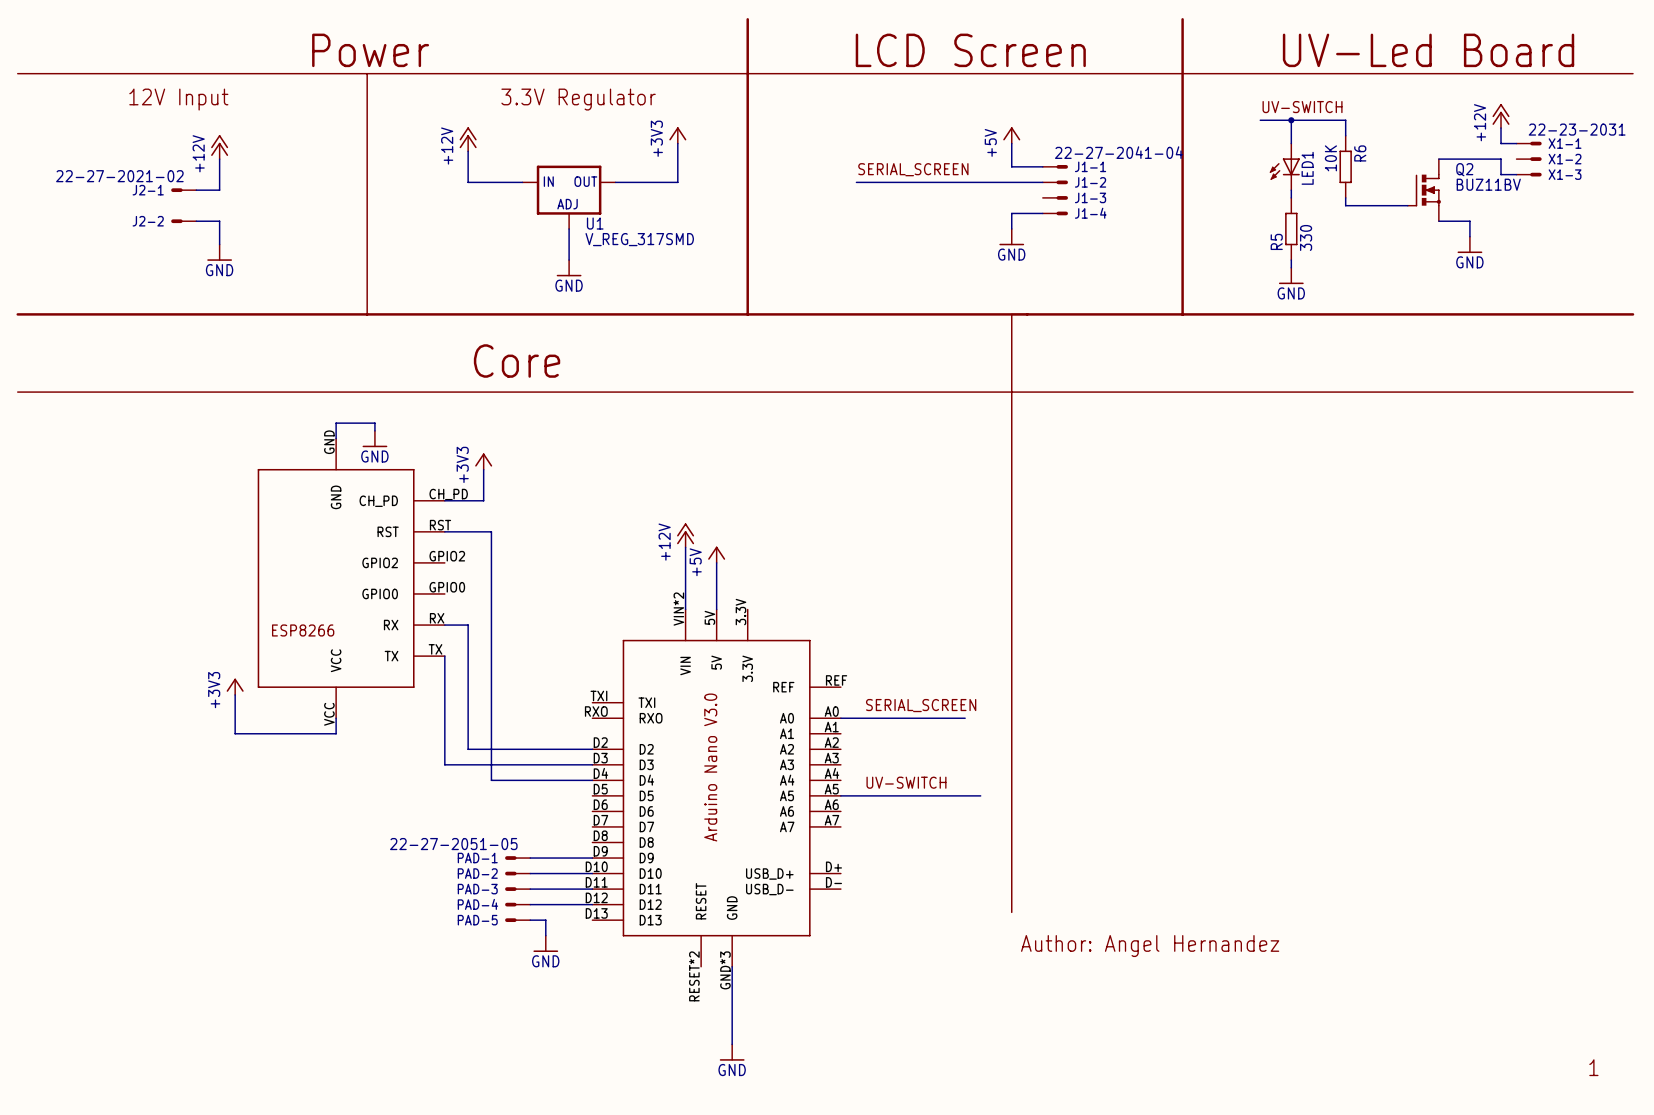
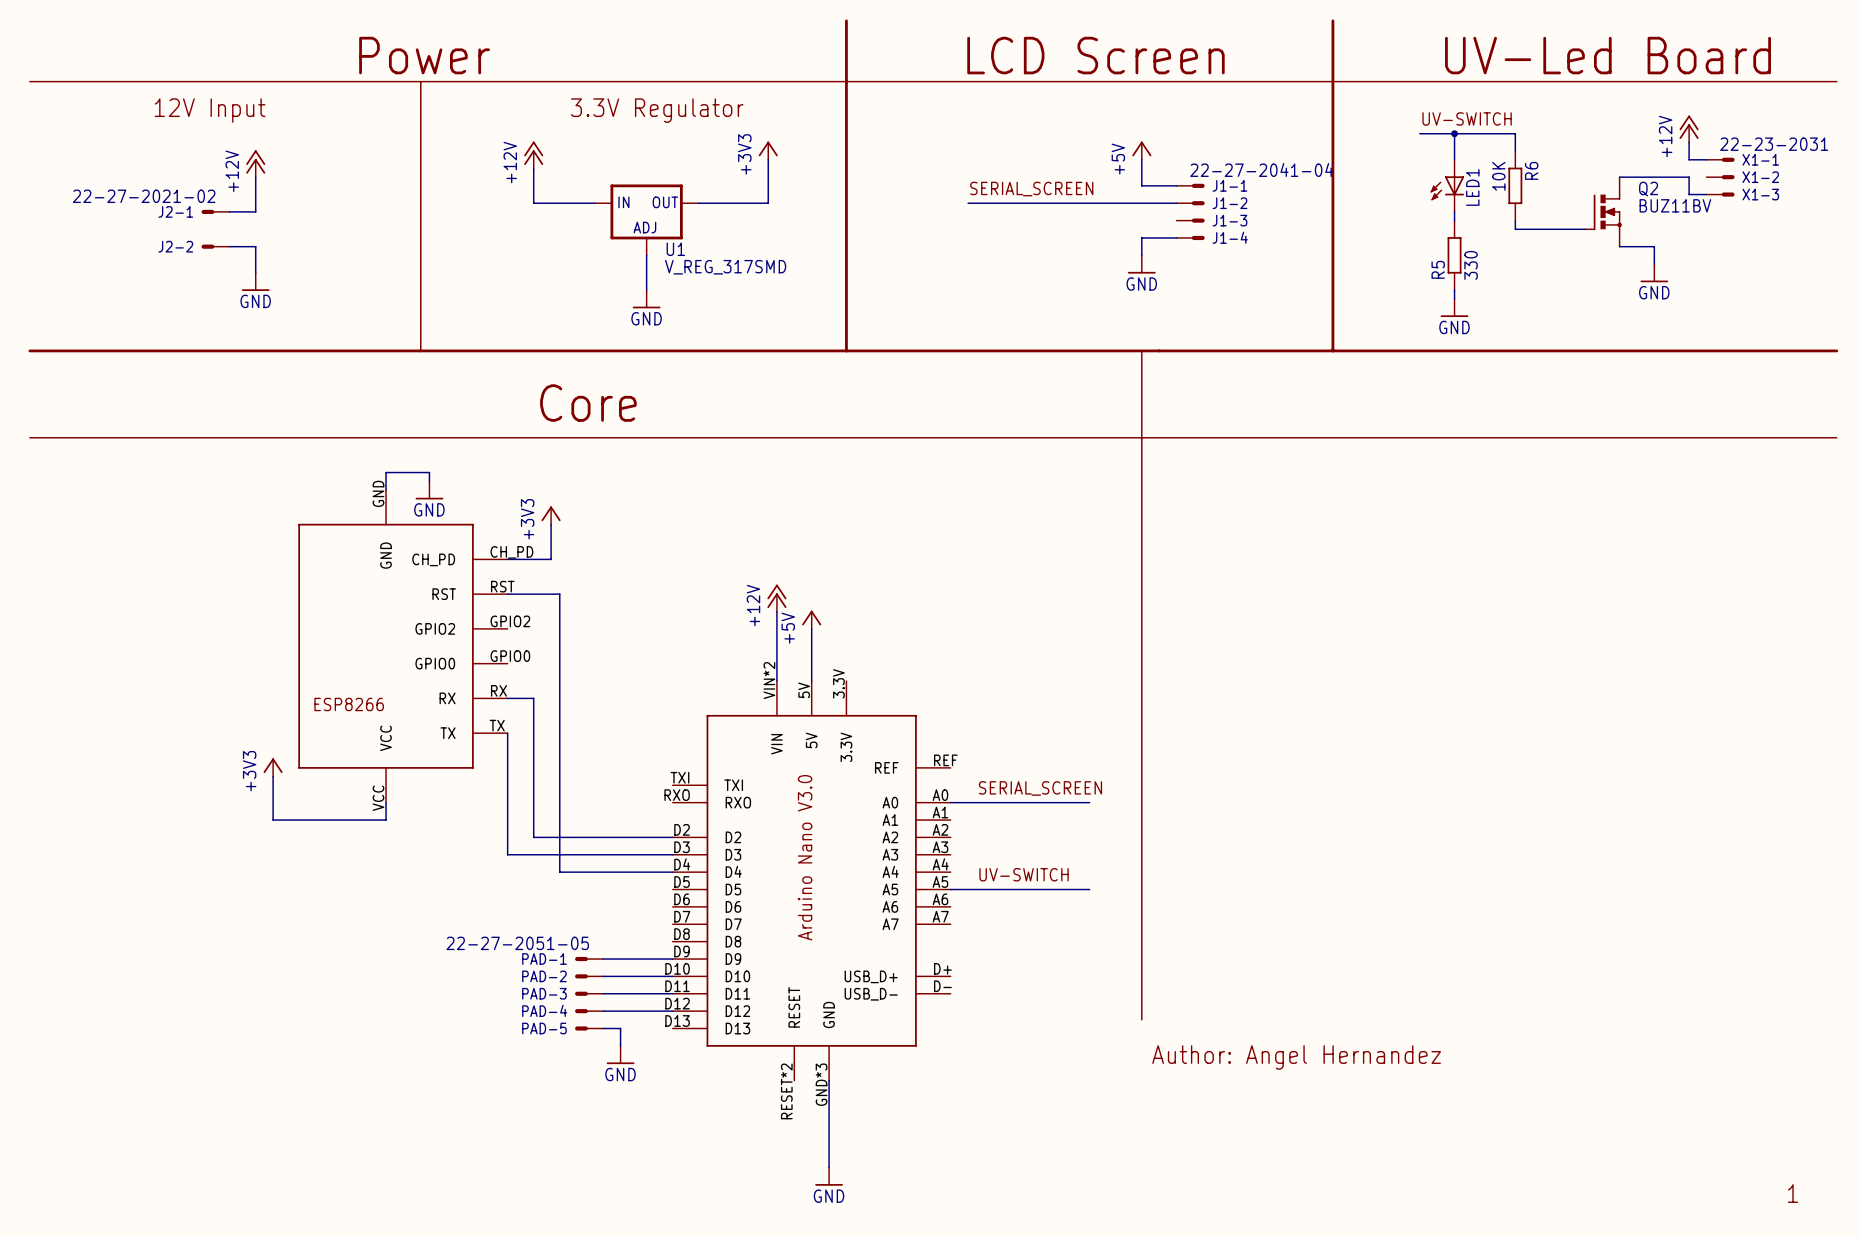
wire: (965, 795) (980, 795) -> none

